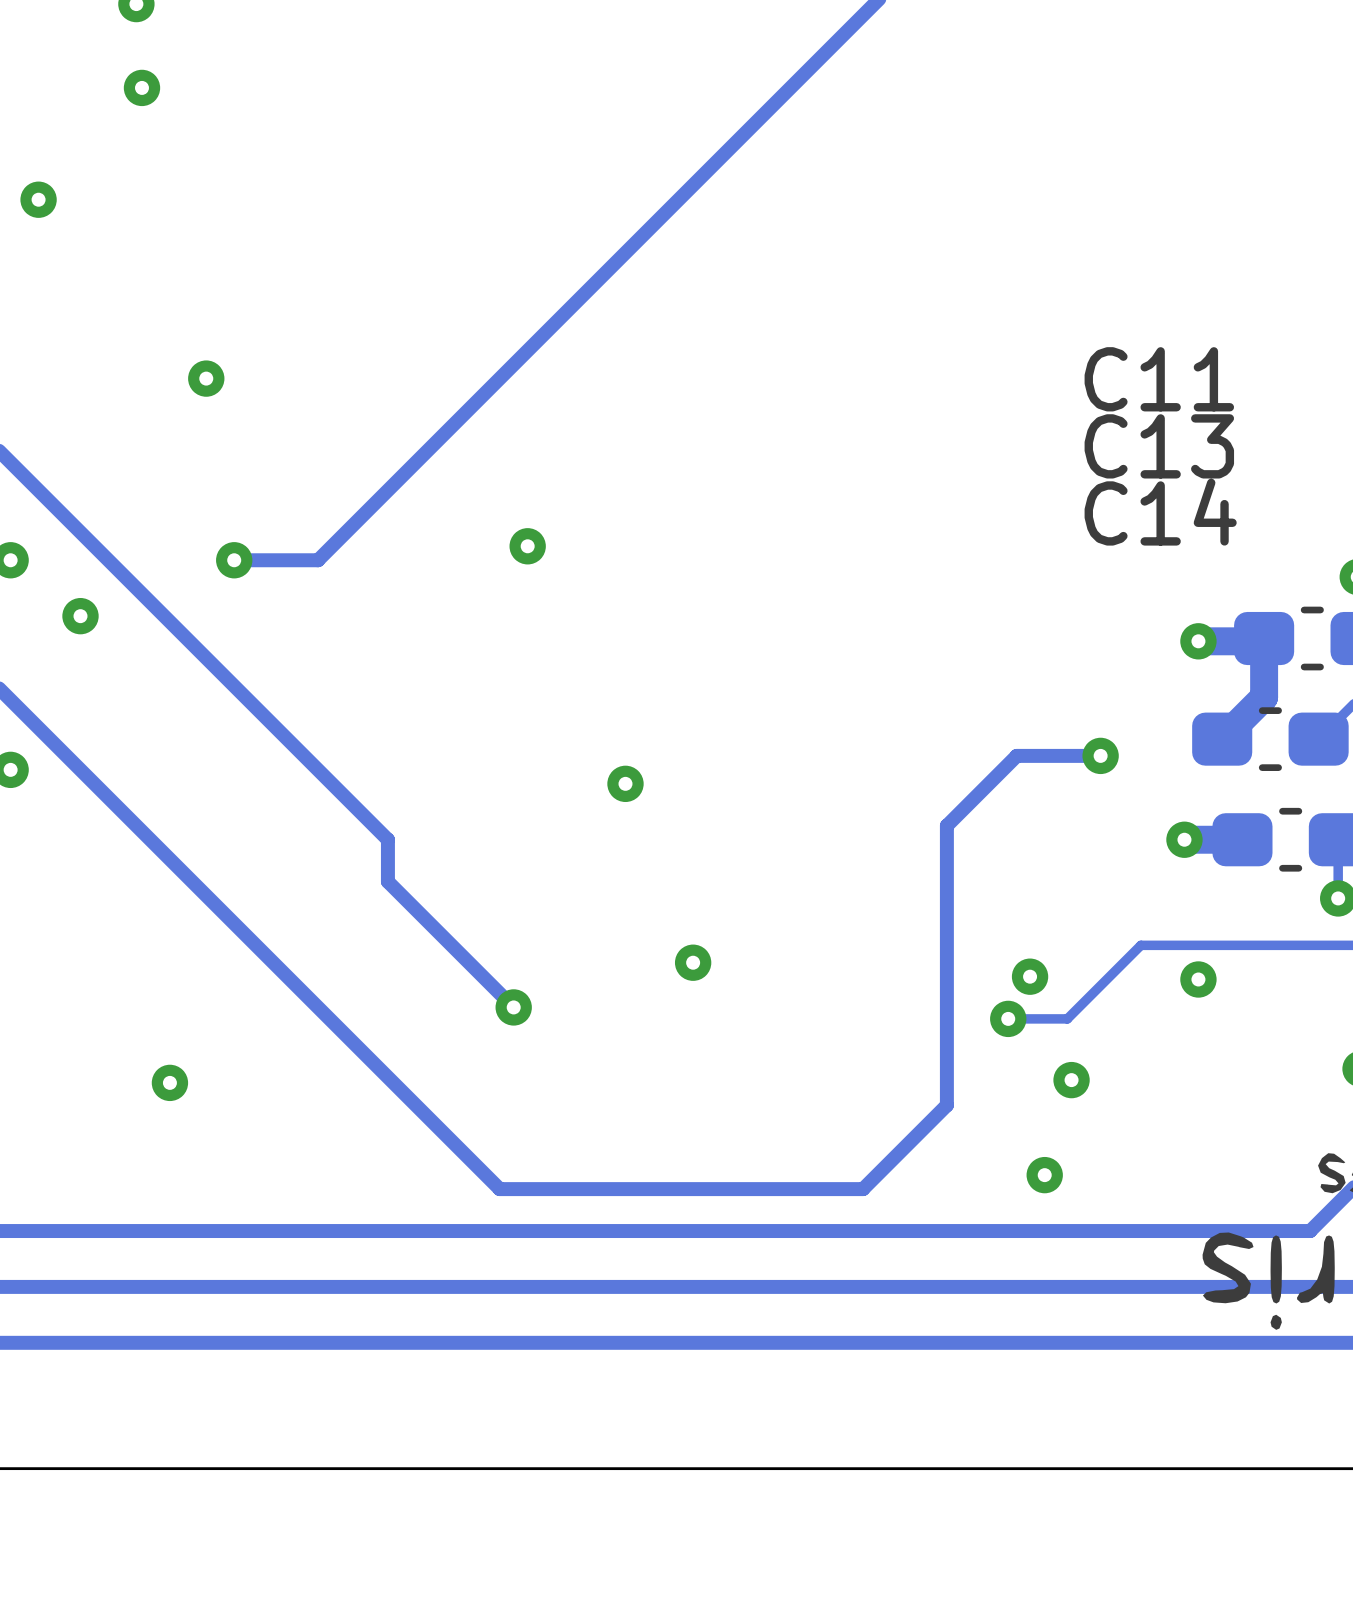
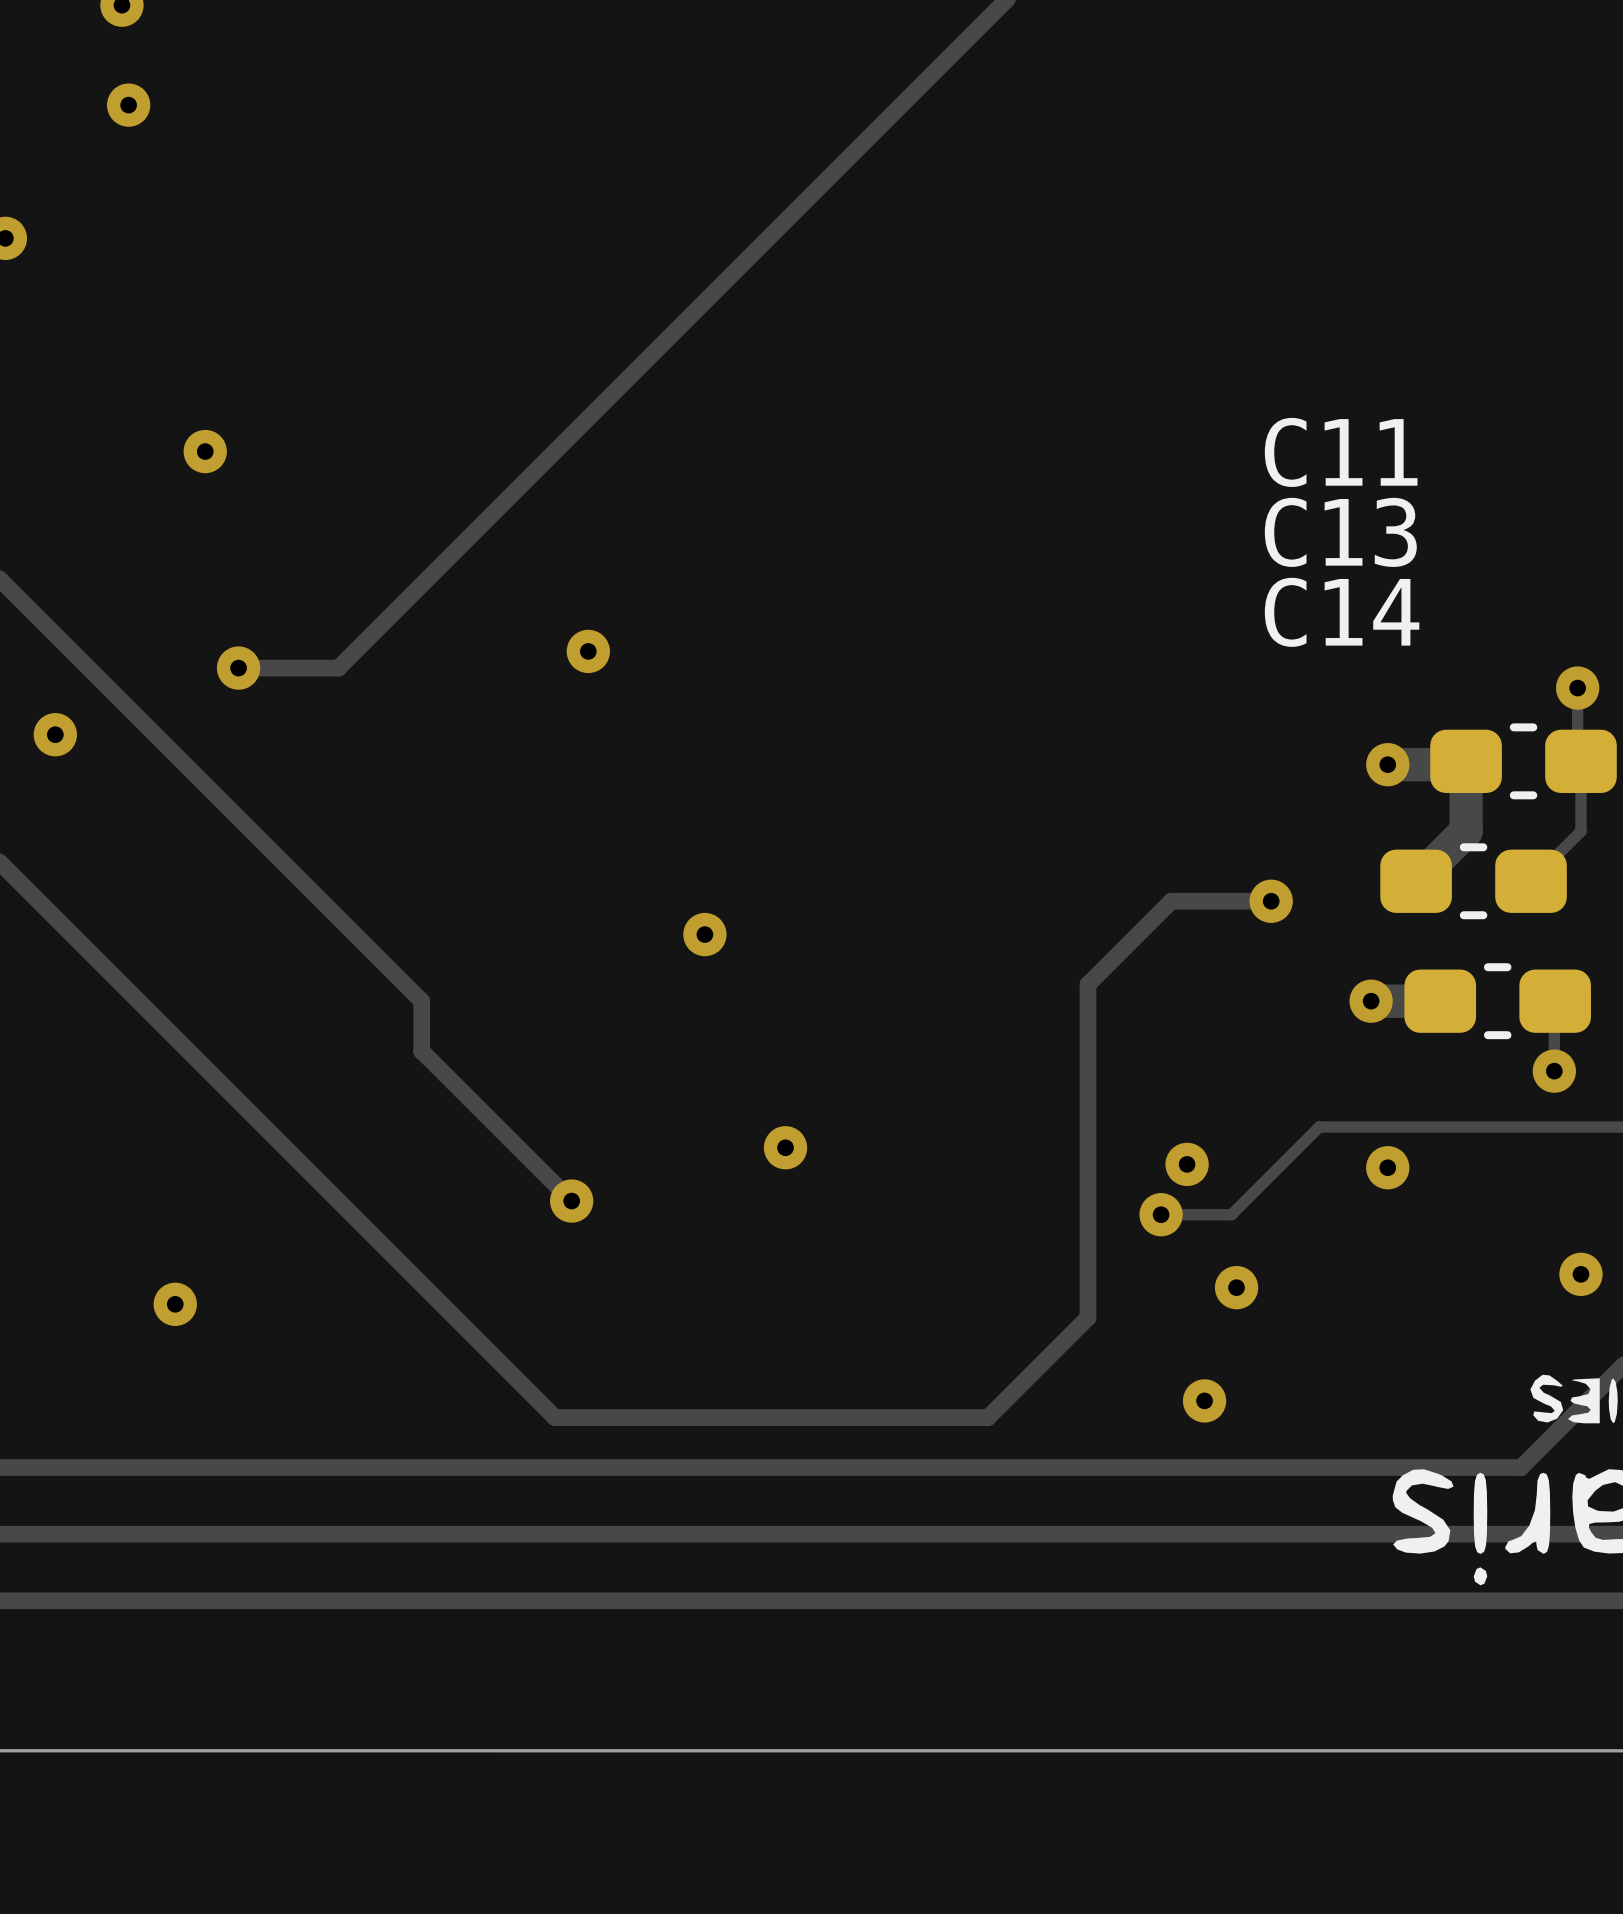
via position: (169, 1082) -> (175, 1304)

